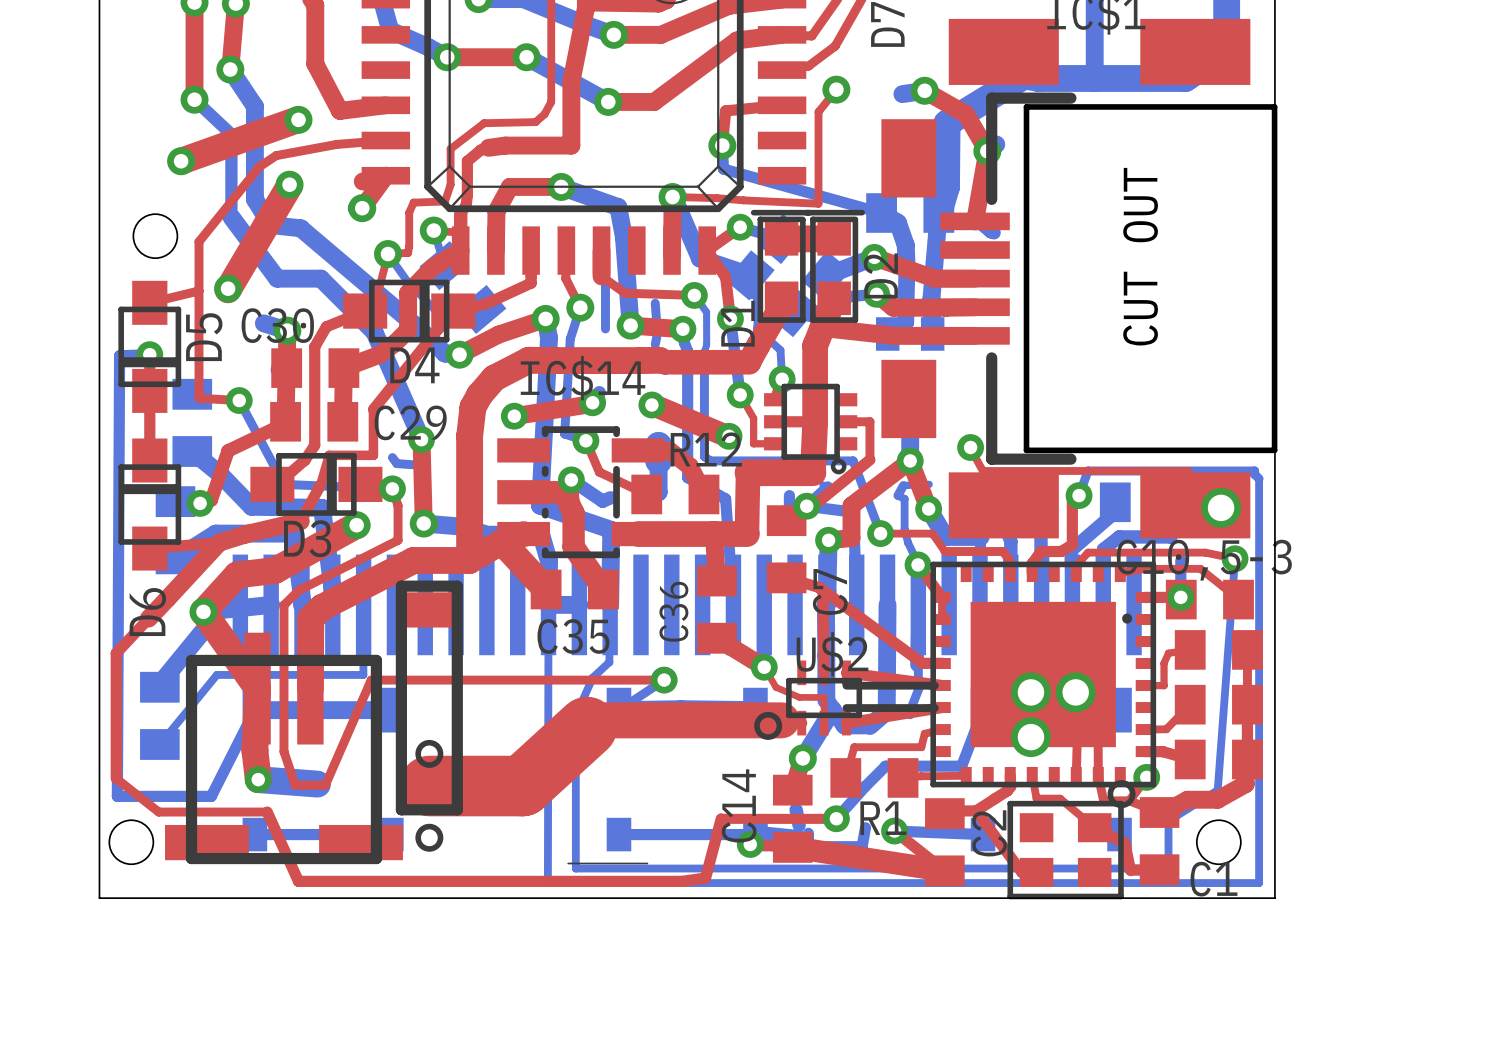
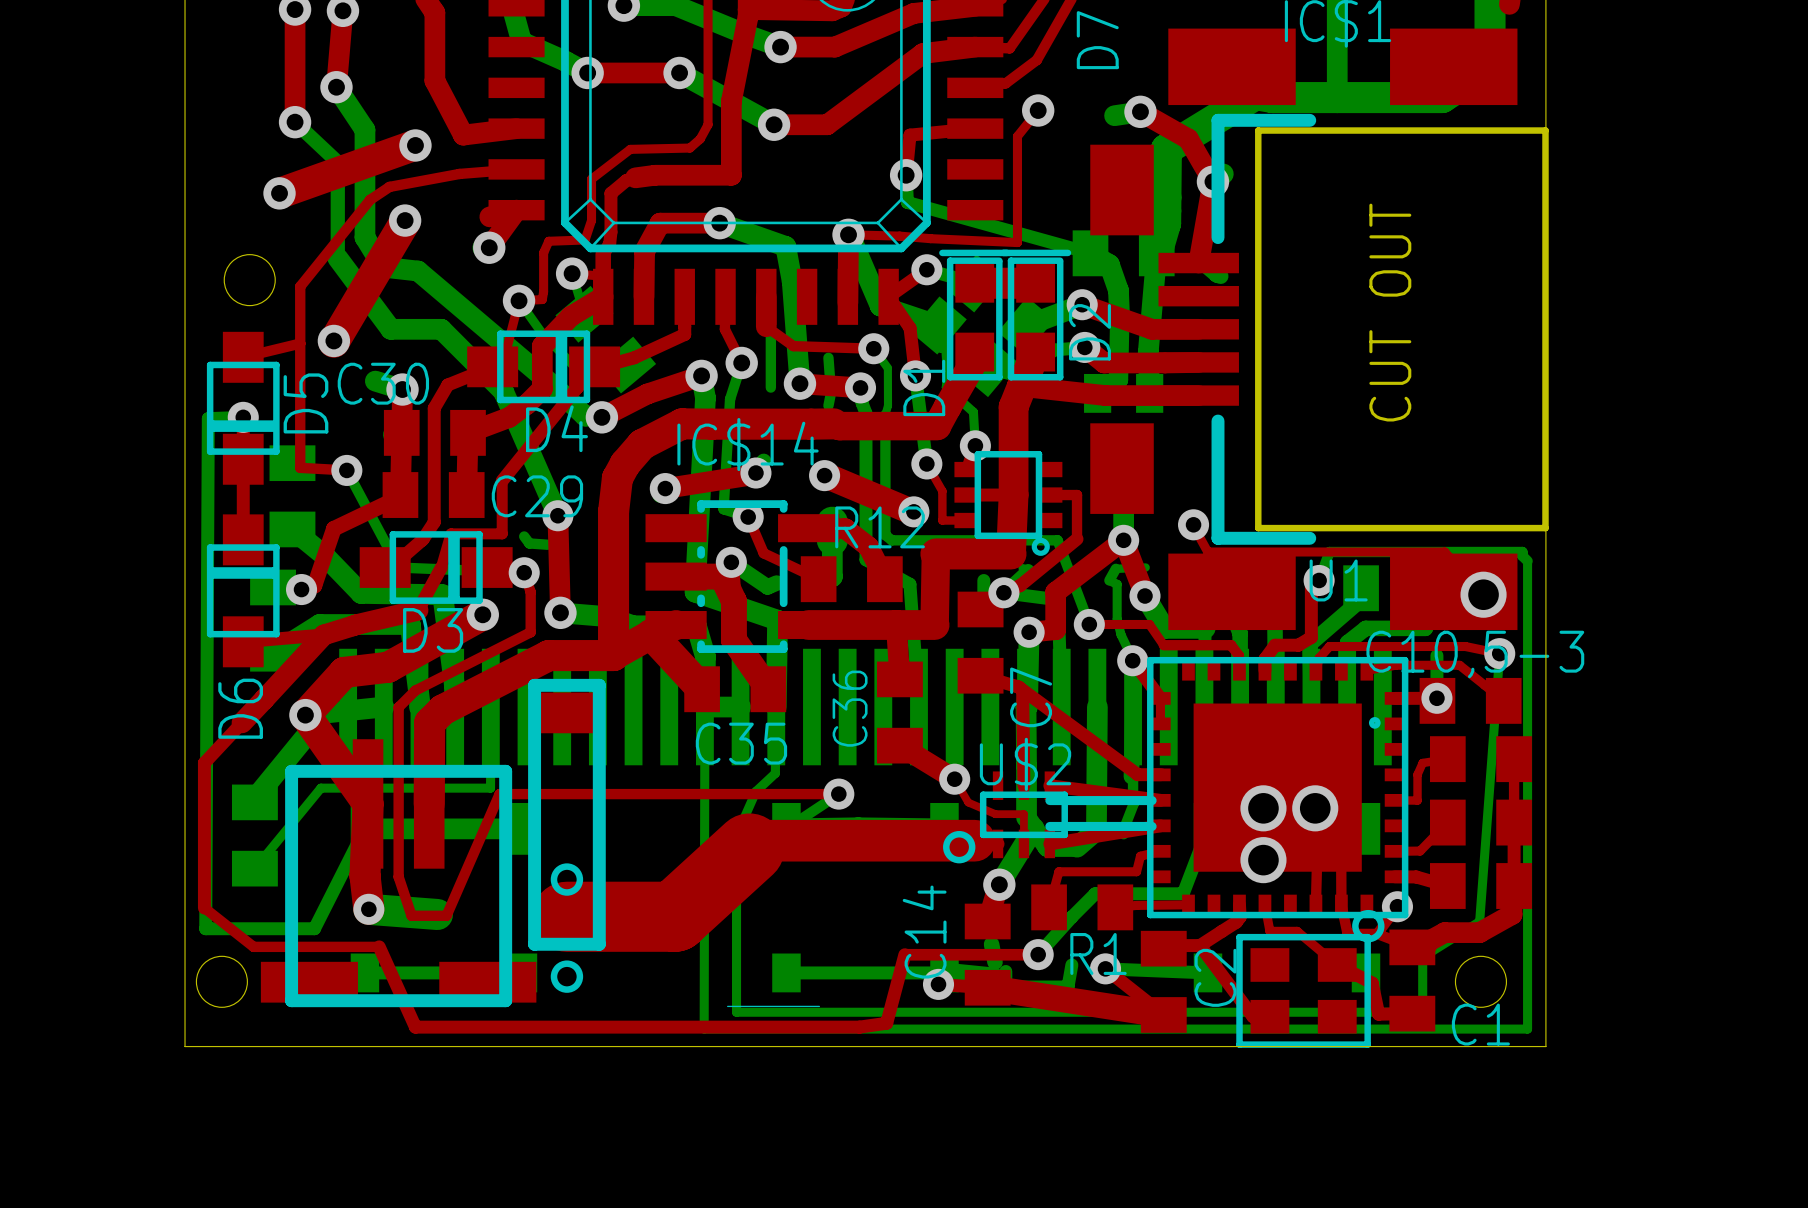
U1 name: none -> U1 (1338, 580)

